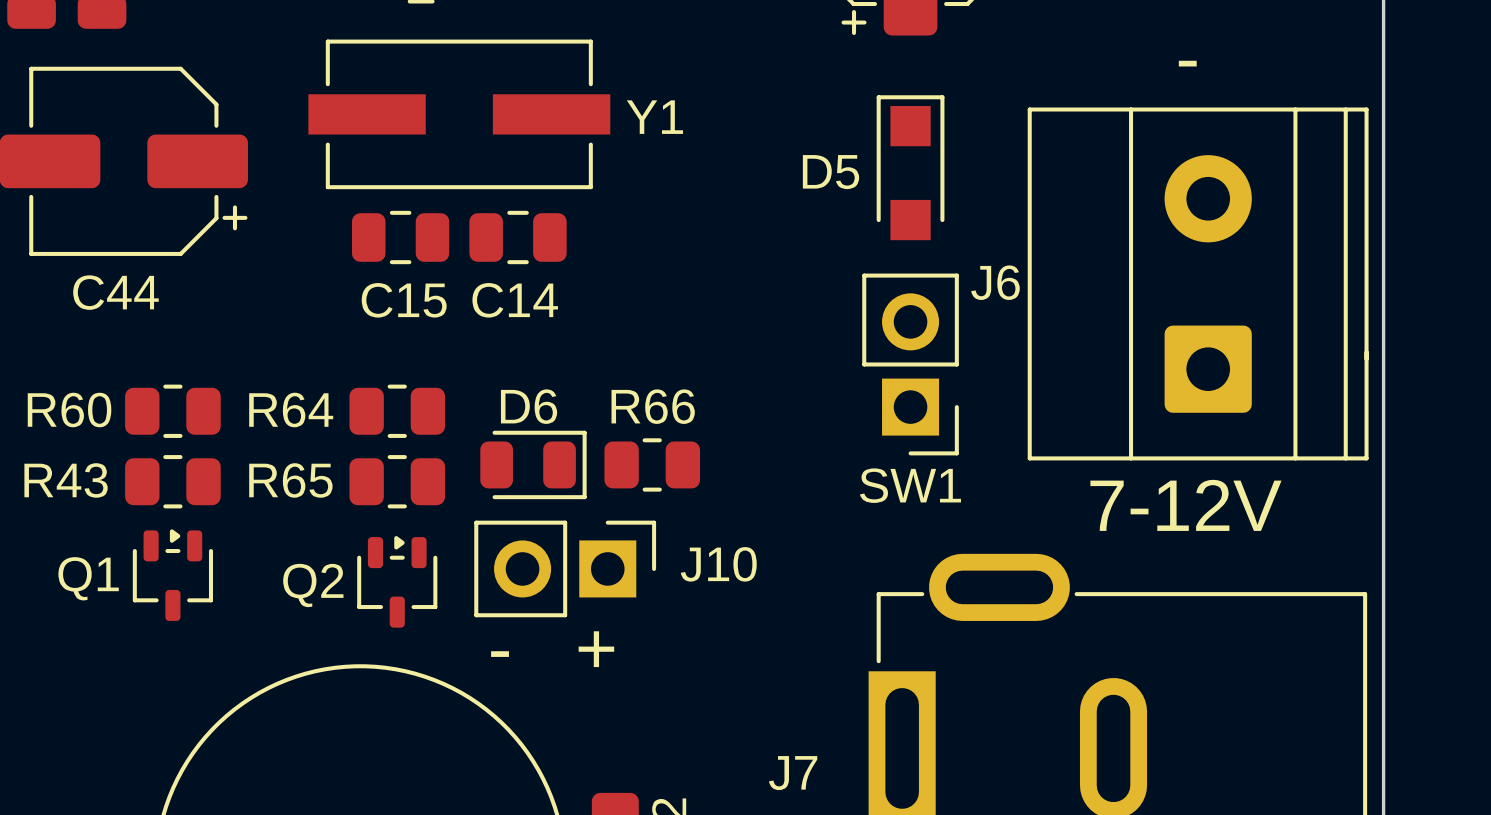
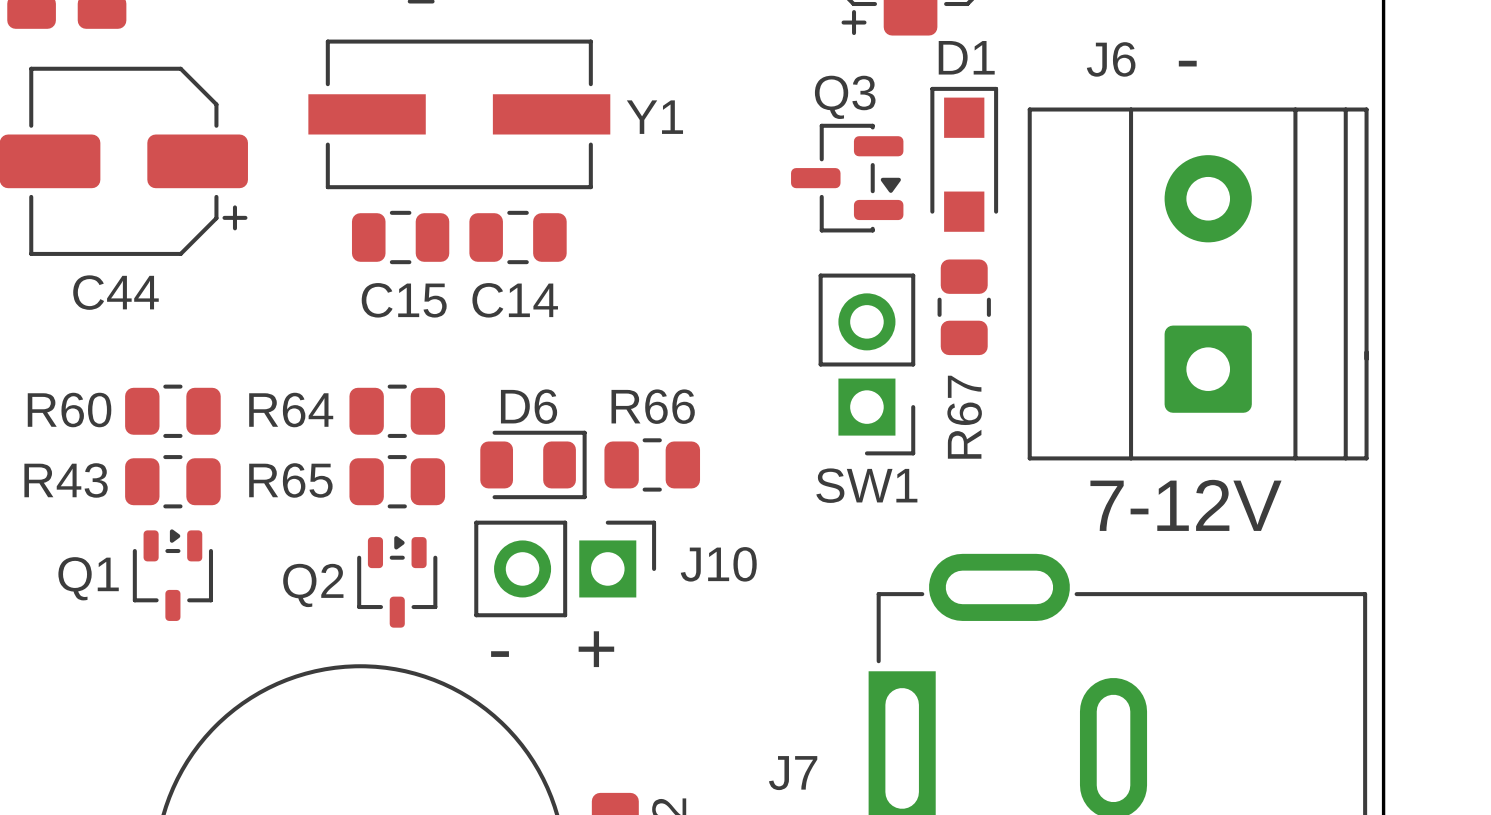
D1: none -> (964, 159)
D5: (910, 167) -> none
Q3: none -> (847, 178)
J6 name position: J6 (995, 282) -> J6 (1111, 59)
R67: none -> (964, 307)
SW1 position: (910, 364) -> (866, 364)

